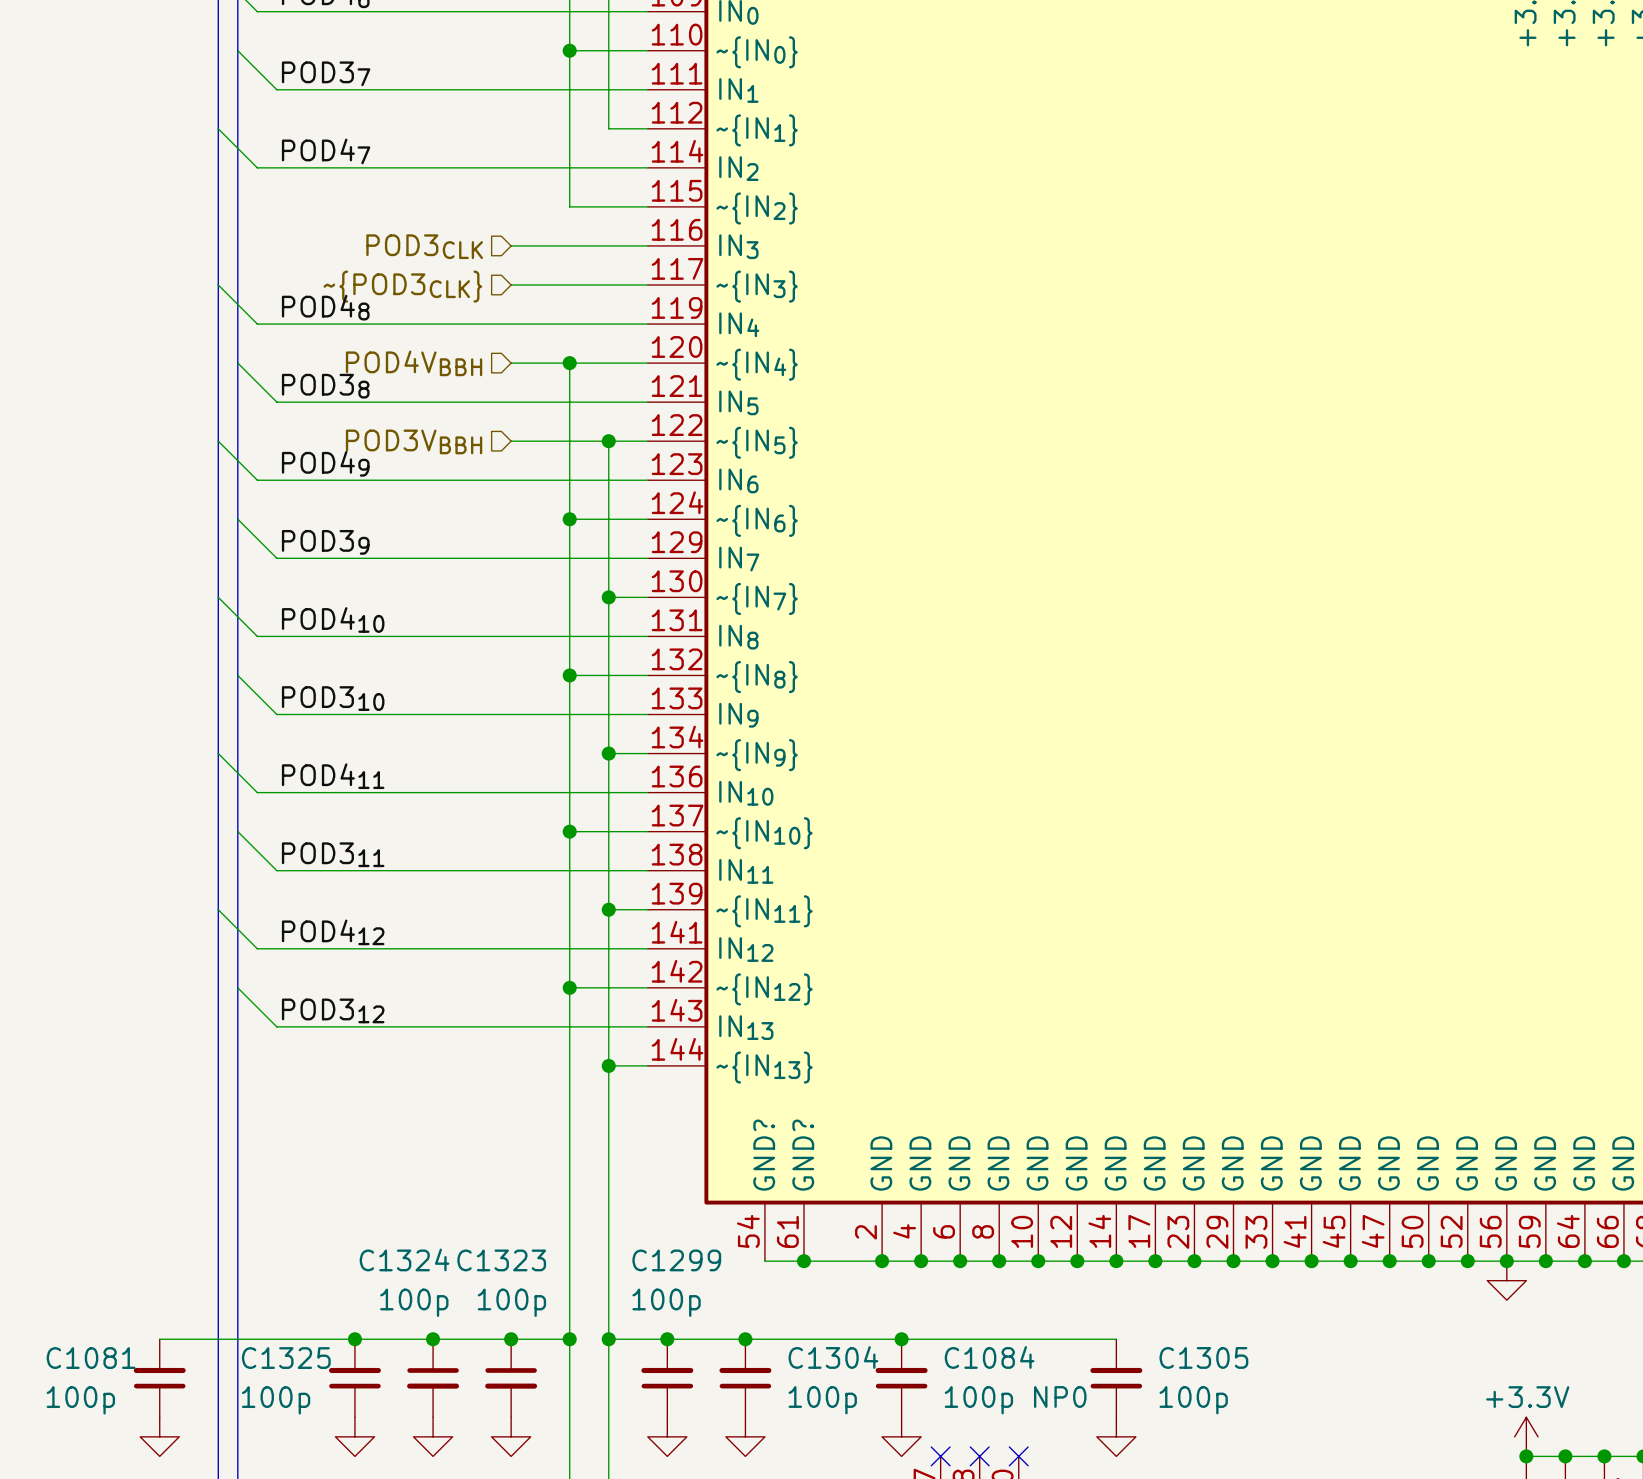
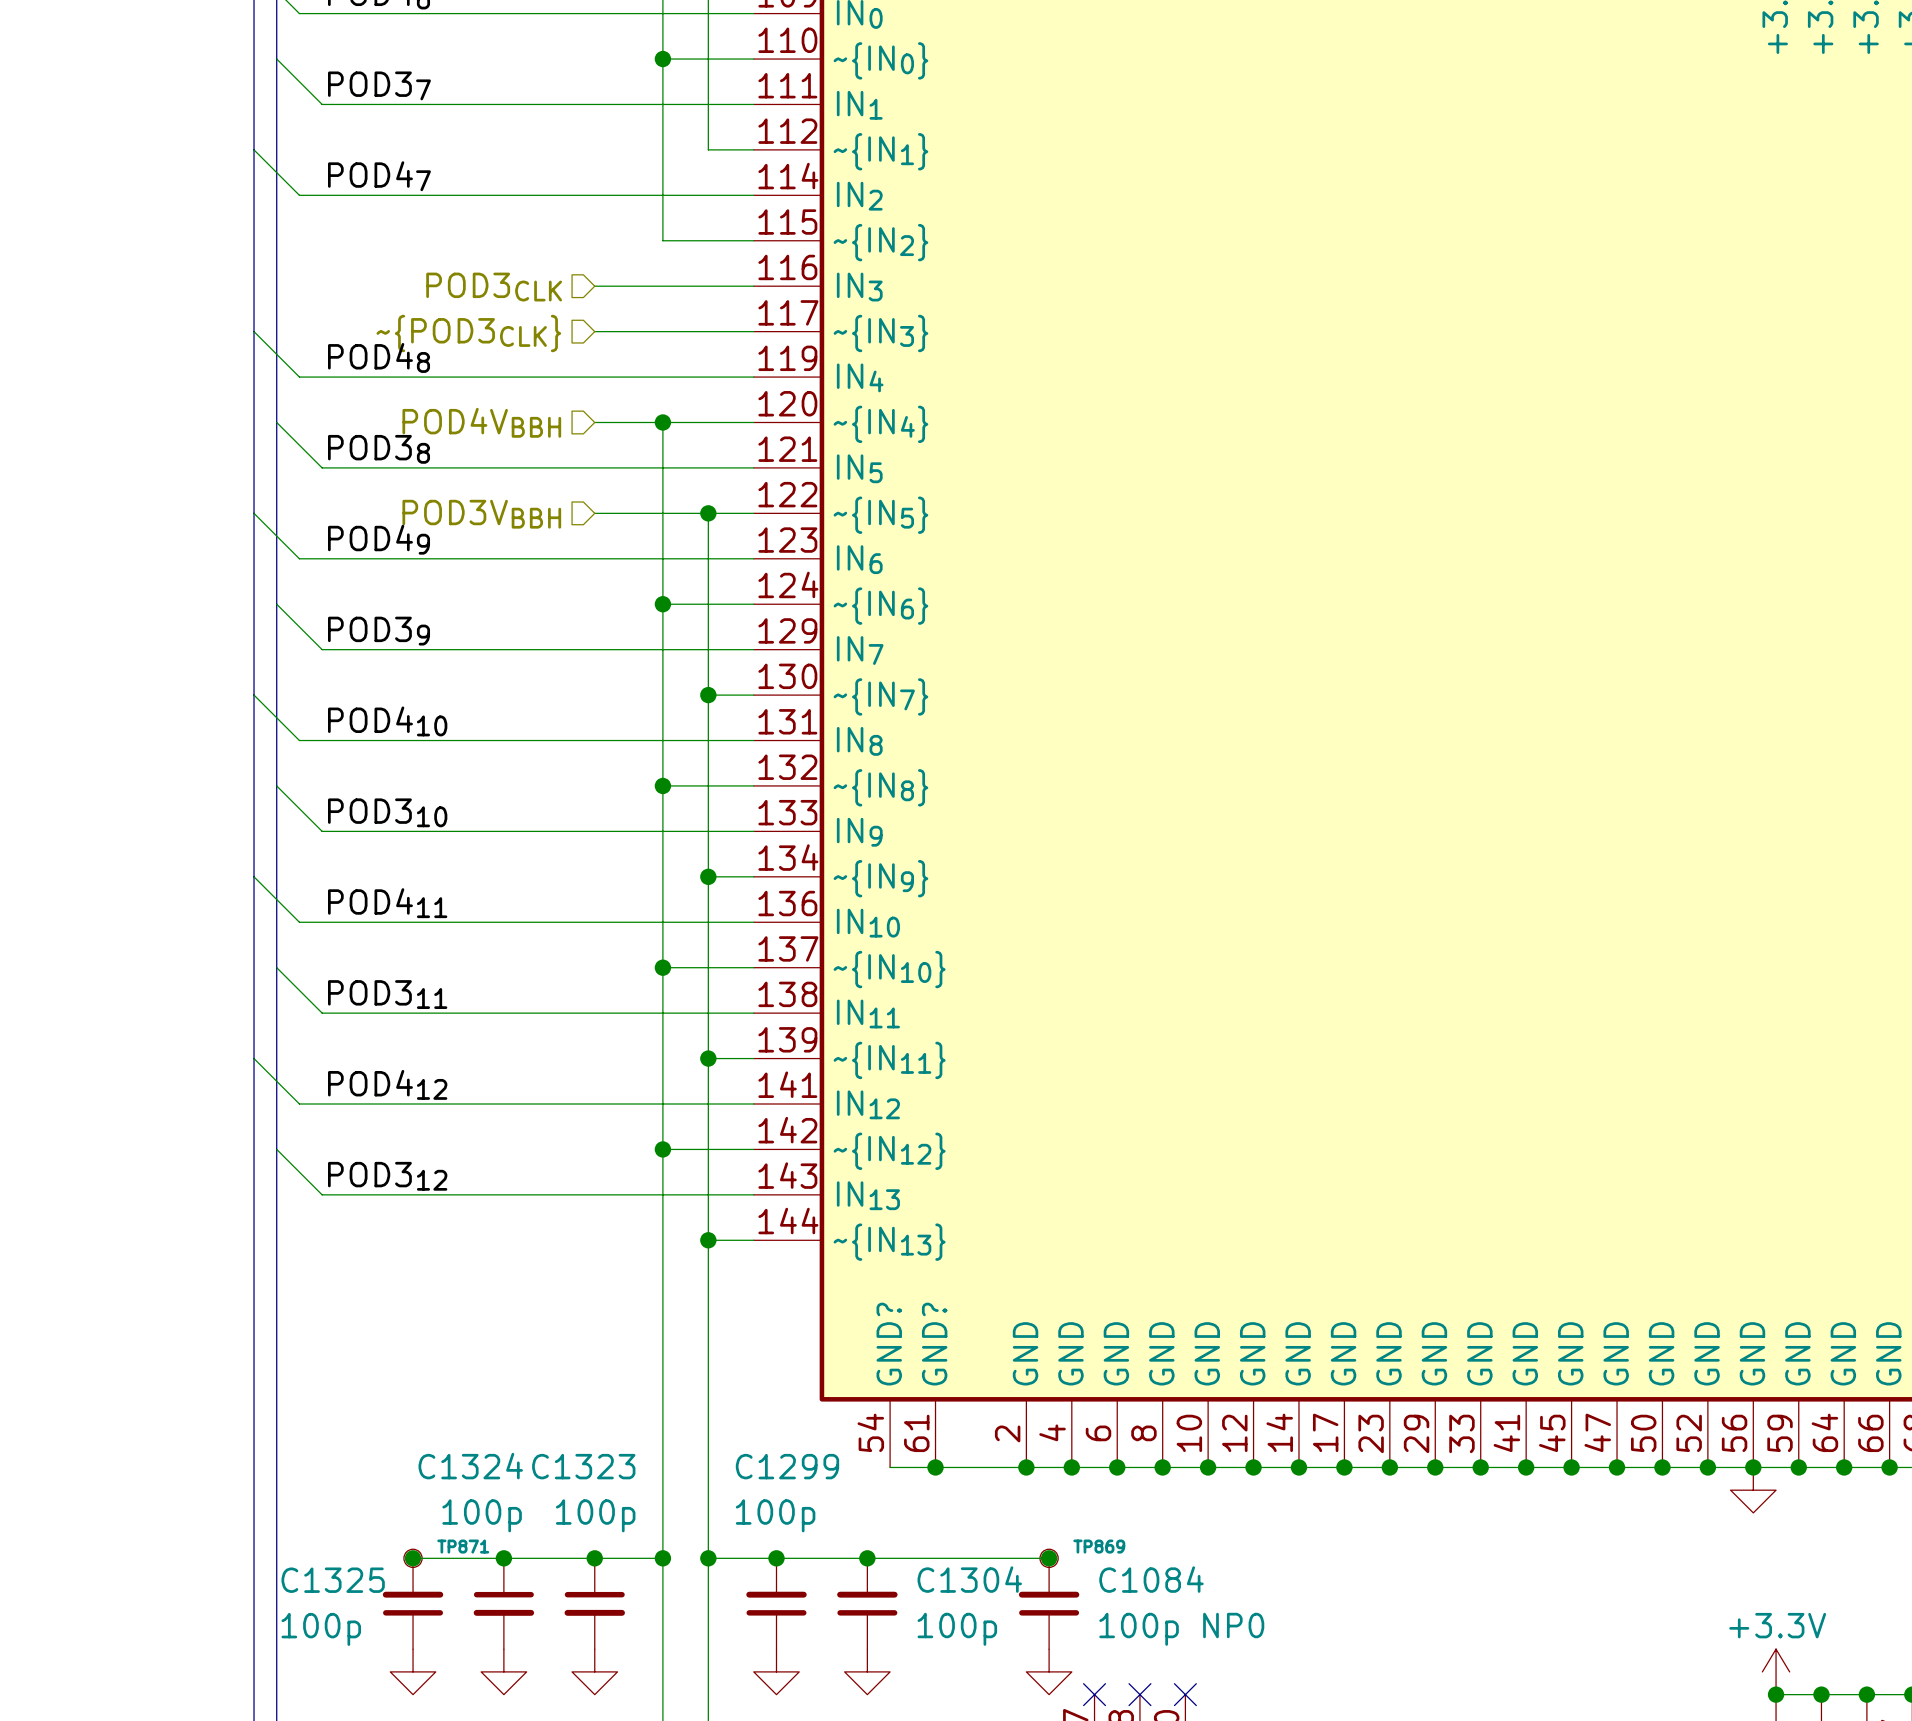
wire: (159, 1339) (354, 1339) -> none
TP871: none -> (413, 1558)
wire: (901, 1339) (1116, 1339) -> none
TP869: none -> (1049, 1558)
C1081: 100p (159, 1378) -> none
C1305: 100p (1116, 1378) -> none
power symbol: (159, 1436) -> none
power symbol: (1116, 1436) -> none

